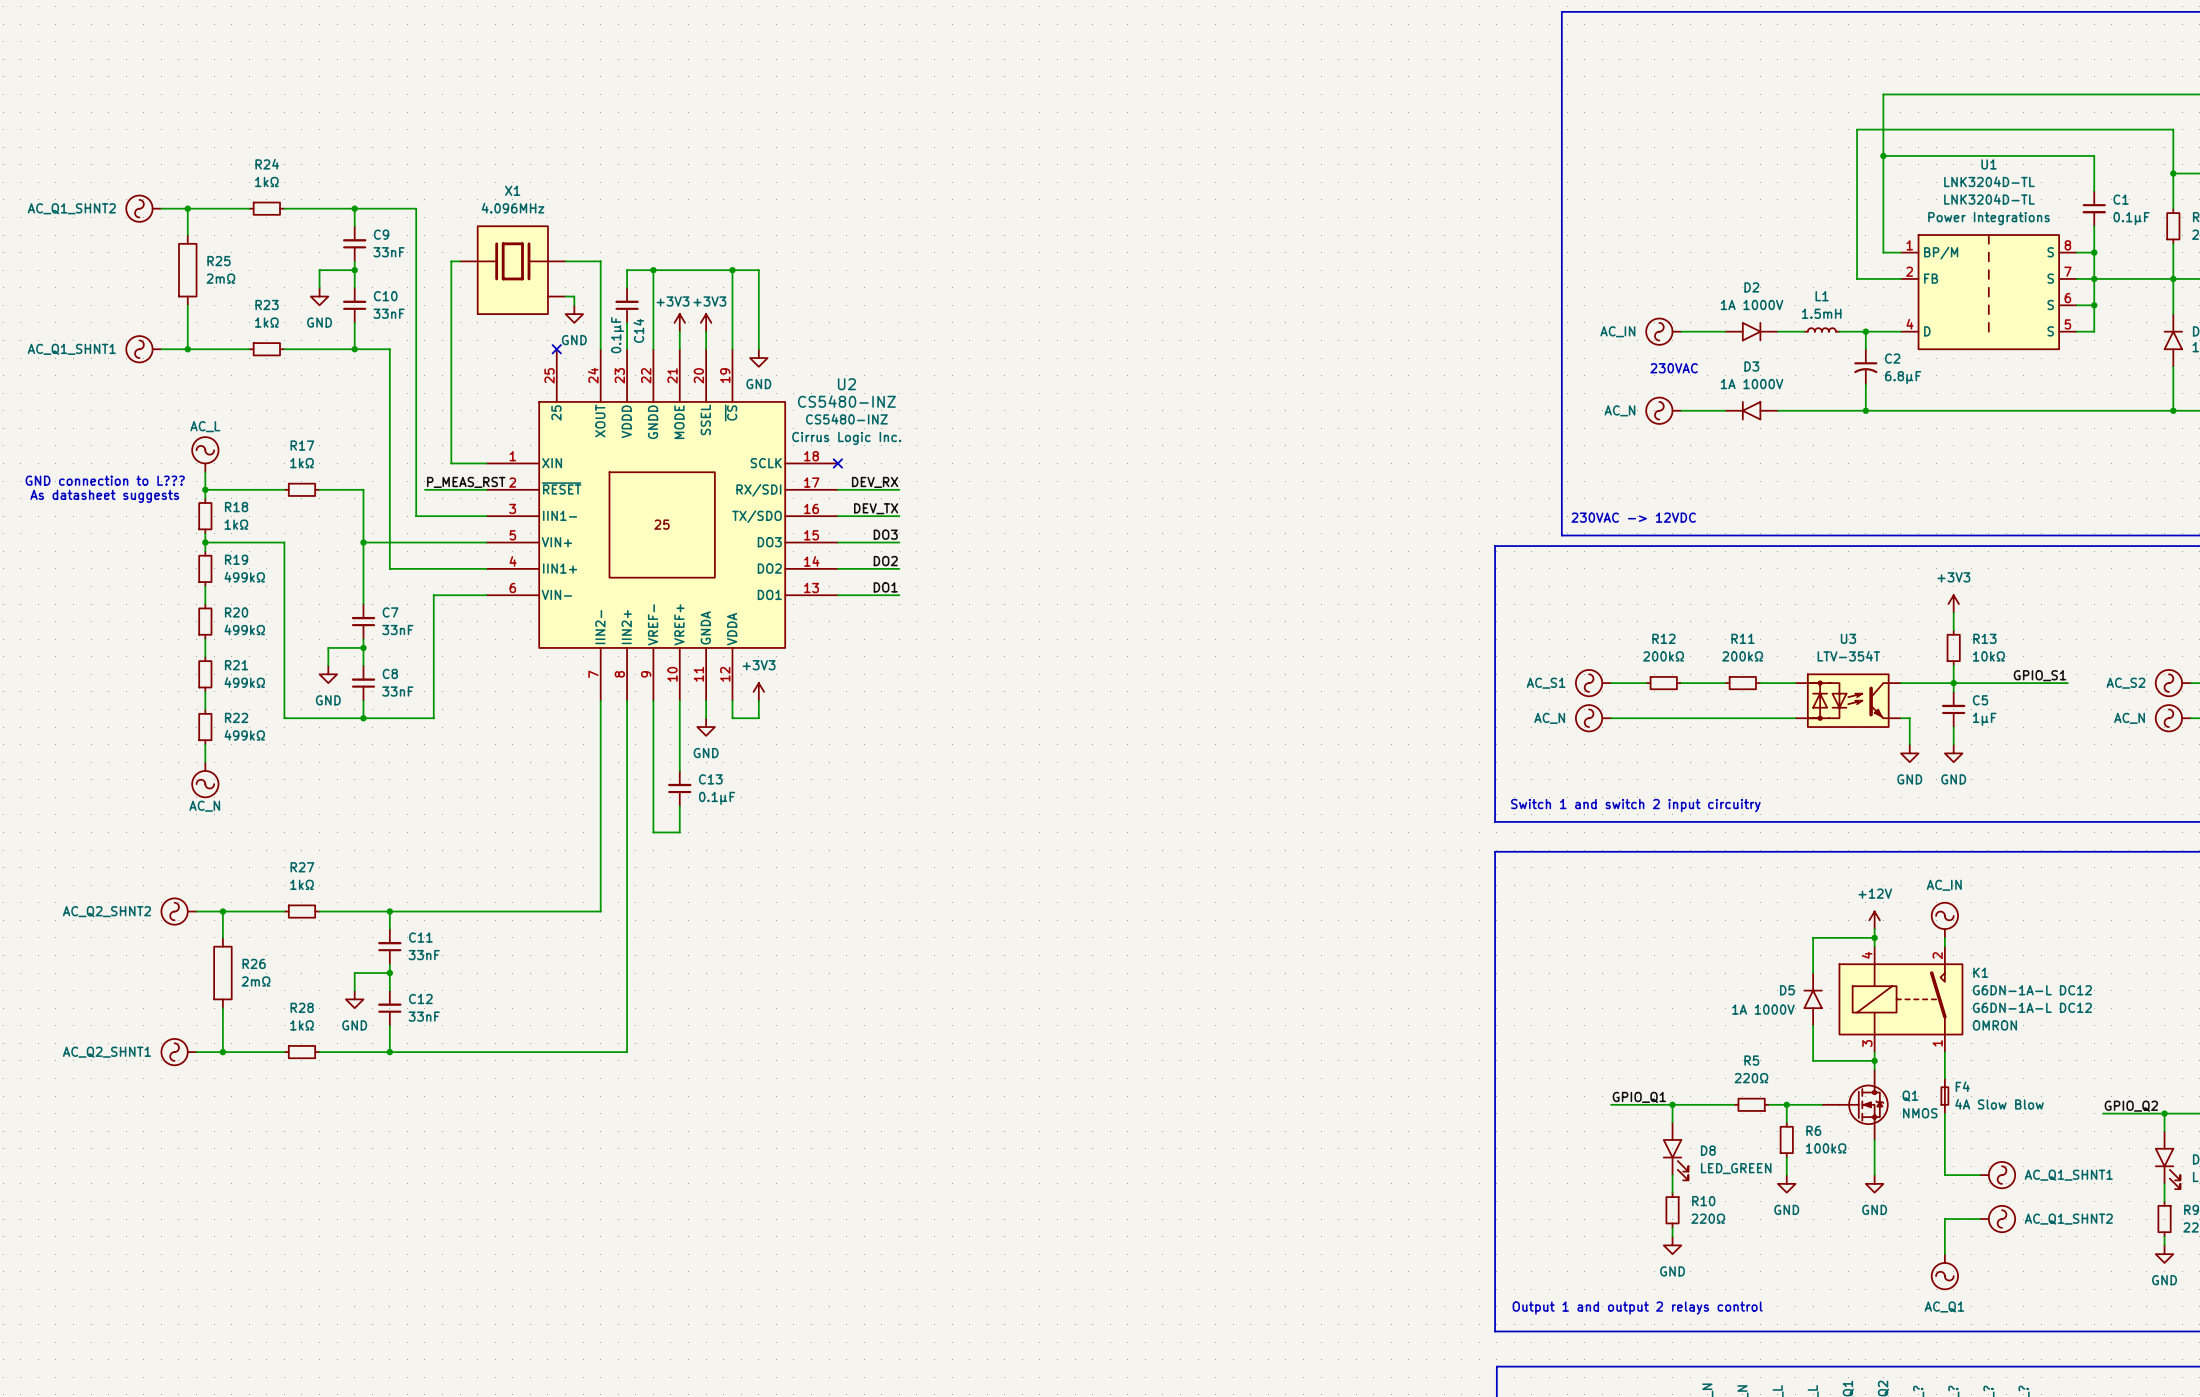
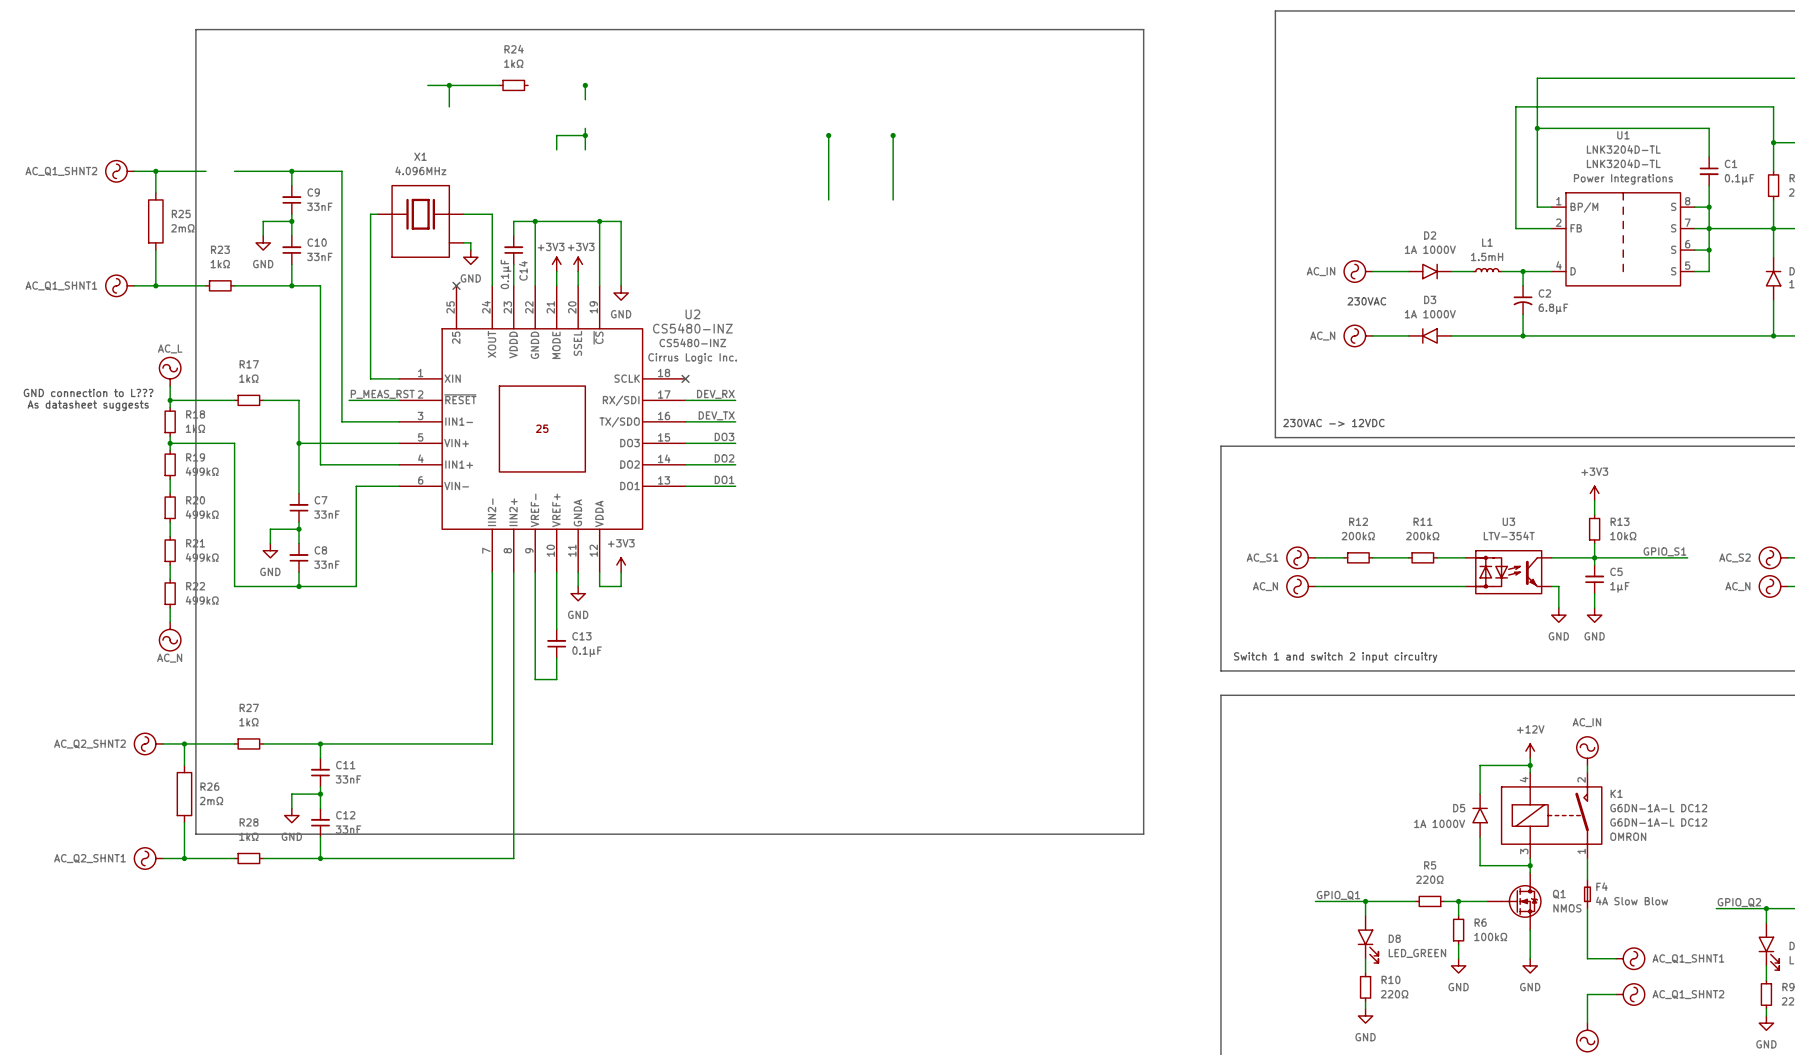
line: none -> (195, 29) (1143, 29) (1143, 834) (195, 834) (195, 29)
wire: none -> (427, 85) (499, 85)
wire: none -> (449, 85) (449, 106)
junction: none -> (449, 85)
wire: none -> (585, 85) (585, 99)
junction: none -> (585, 85)
wire: none -> (585, 128) (585, 149)
wire: none -> (585, 135) (556, 135) (556, 149)
junction: none -> (585, 135)
wire: none -> (828, 135) (828, 199)
junction: none -> (828, 135)
wire: none -> (893, 135) (893, 199)
junction: none -> (893, 135)
R24 position: (266, 208) -> (513, 85)

